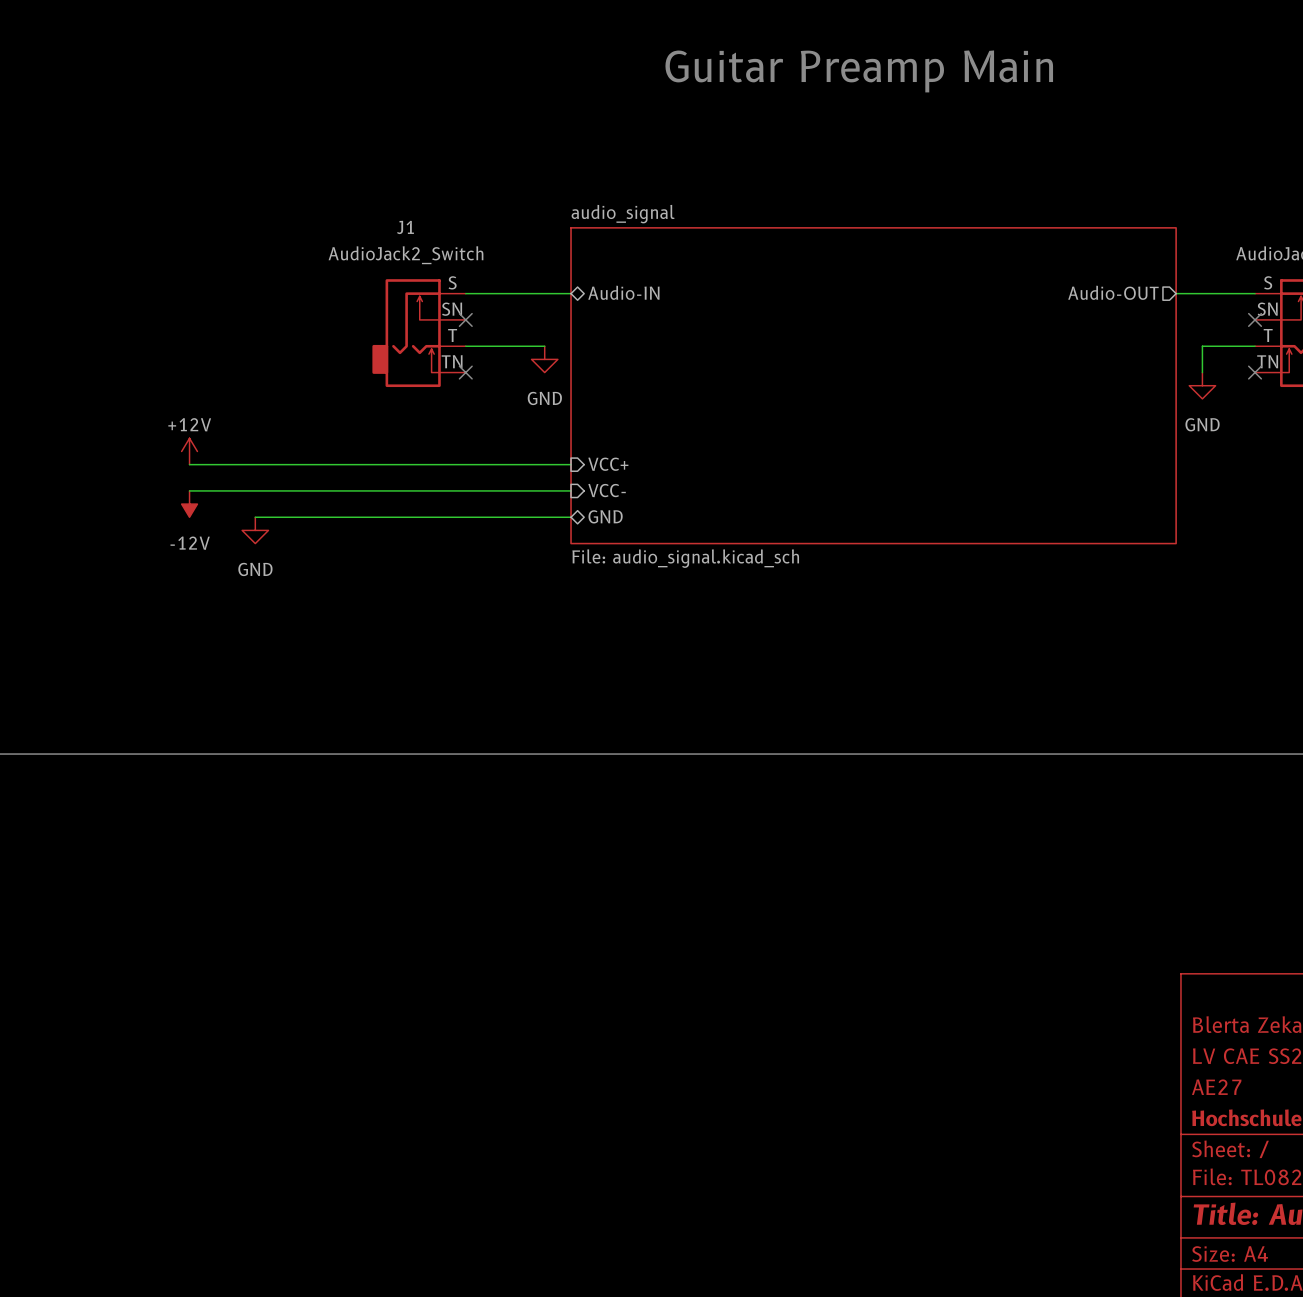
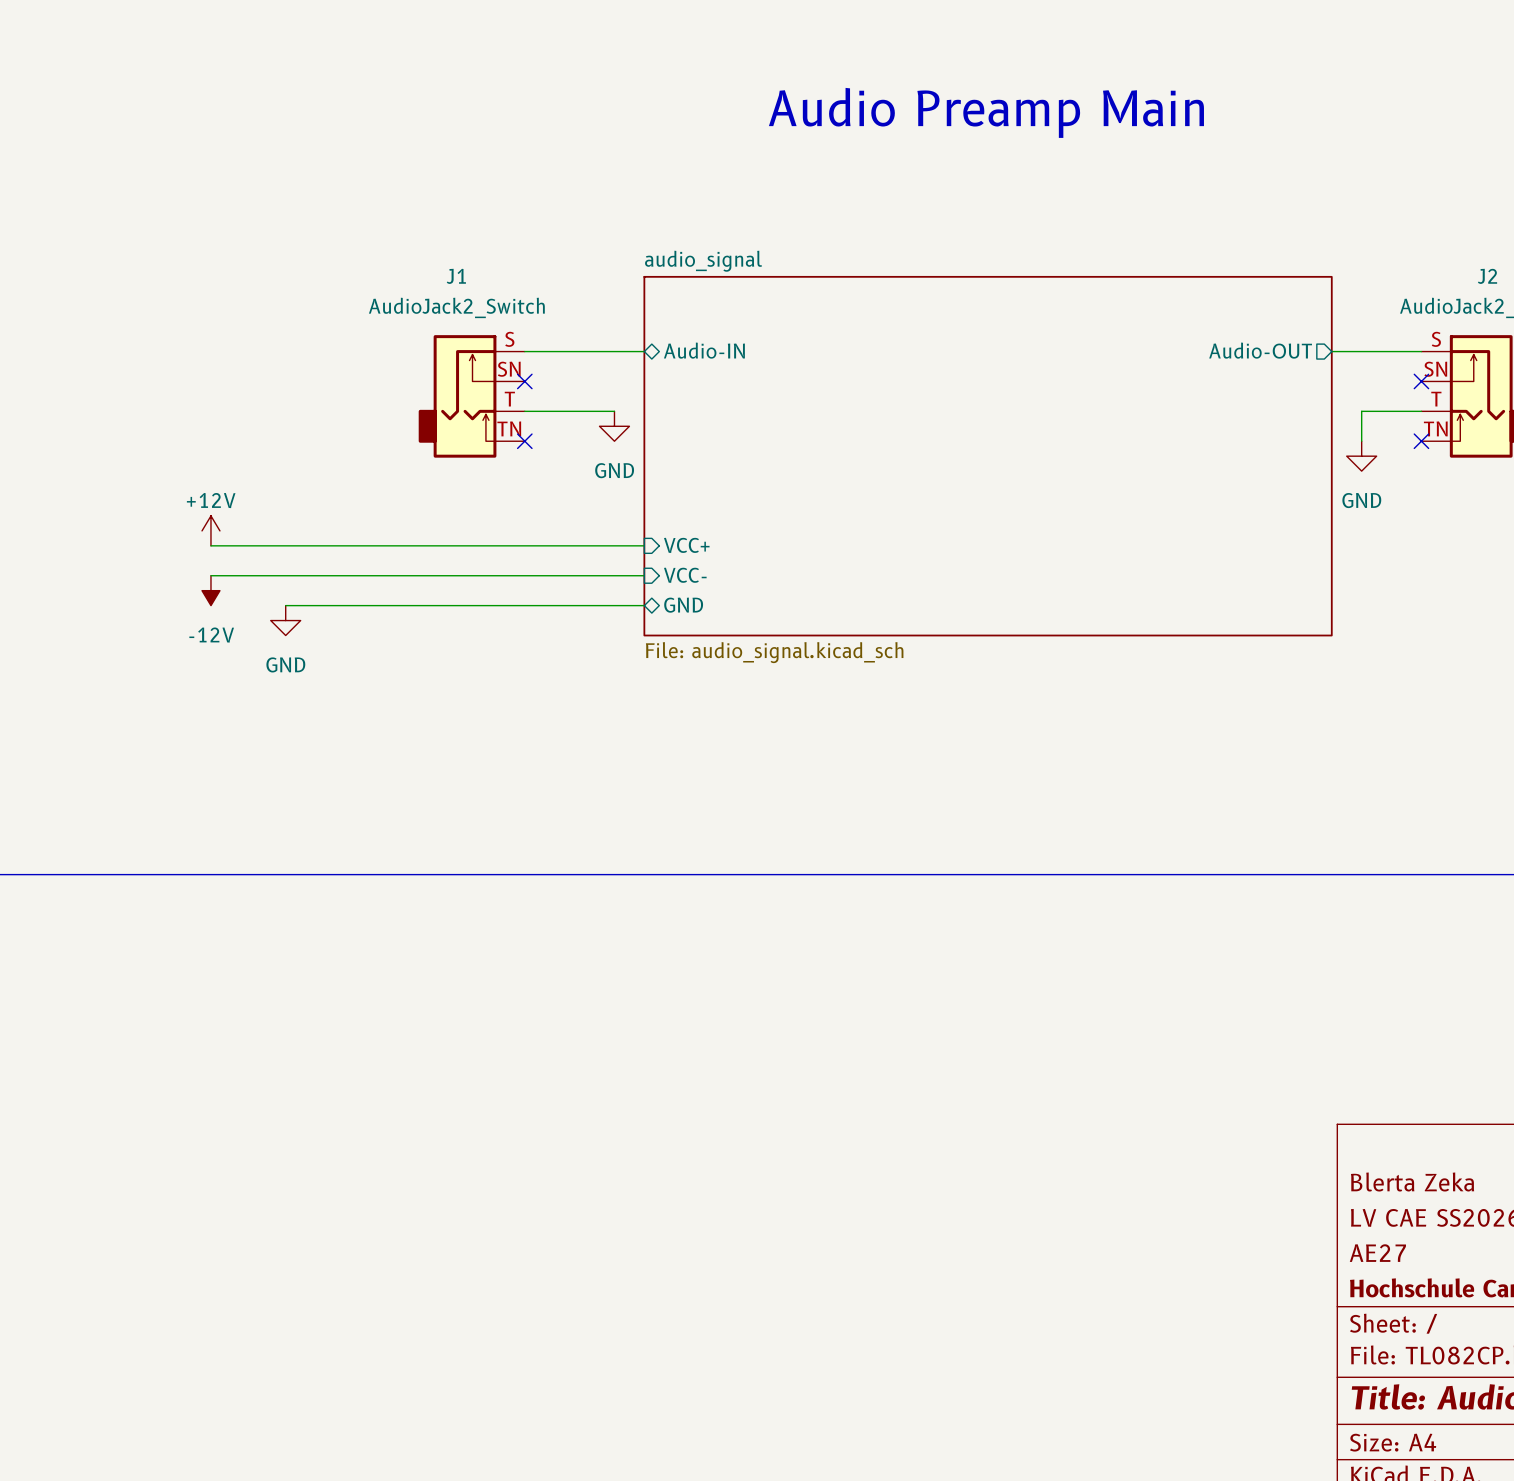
text: Guitar Preamp Main (859, 71) -> Audio Preamp Main (986, 112)

